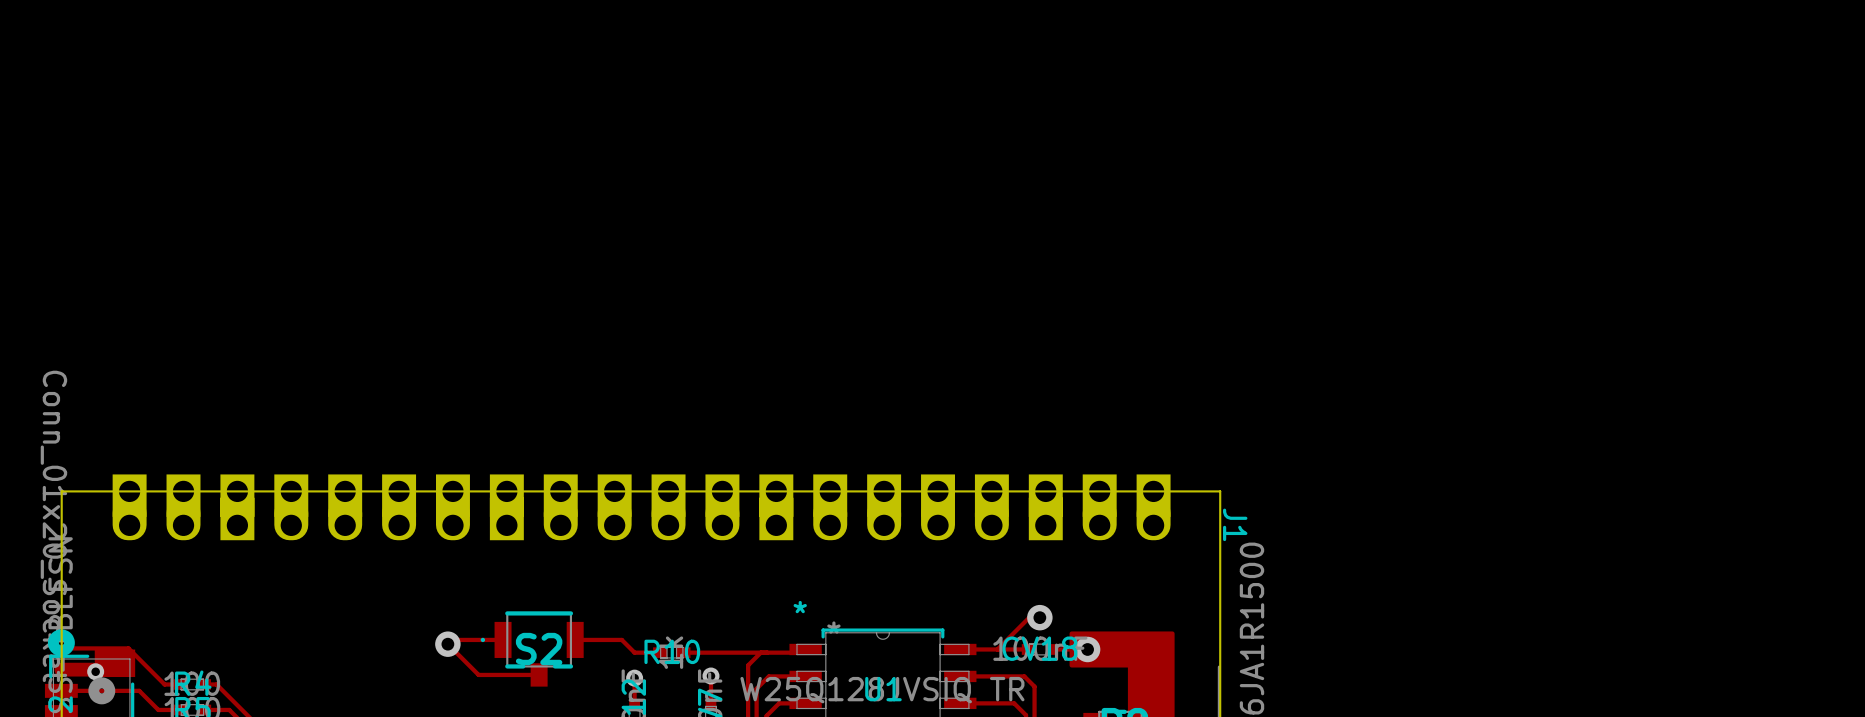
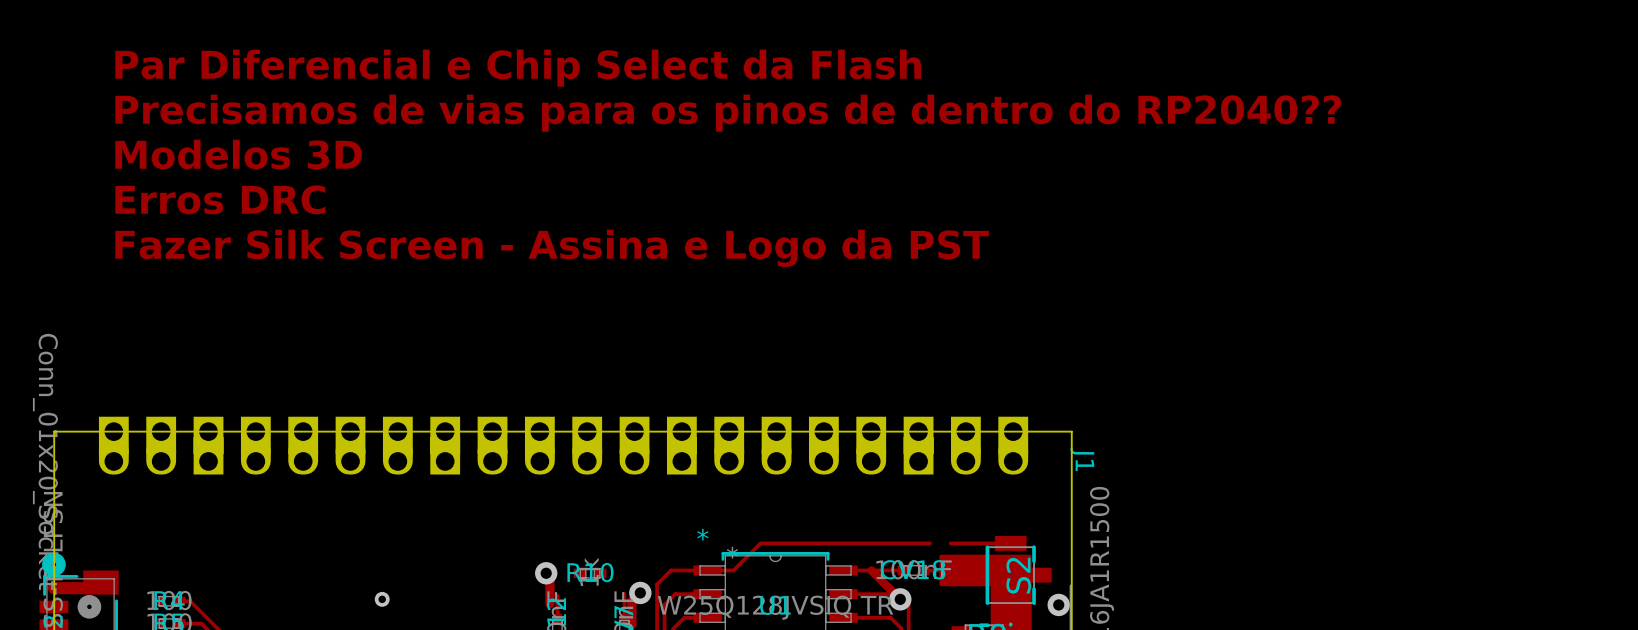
text: none -> Par Diferencial e Chip Select da Flash (518, 68)
text: none -> Precisamos de vias para os pinos de dentro do RP2040?? (728, 113)
text: none -> Modelos 3D (238, 154)
text: none -> Erros DRC (220, 199)
text: none -> Fazer Silk Screen - Assina e Logo da PST (552, 248)
track: (1039, 617) (1029, 617) (997, 649) -> none
via: (1039, 617) -> none
track: none -> (930, 543) (760, 543) (733, 570) (671, 570) (668, 573)
track: none -> (950, 543) (1010, 543)
track: (503, 639) (452, 639) (447, 644) (478, 674) (539, 674) -> none
track: (575, 639) (621, 639) (634, 652) (660, 652) -> none
via: (447, 644) -> none
track: (61, 648) (128, 648) (164, 684) (180, 684) -> none
S2 rotation: 0° (532, 648) -> 90° counterclockwise (1018, 581)
S2 position: (532, 648) -> (1018, 581)
track: none -> (871, 570) (900, 599)
via: (1087, 649) -> none
track: none -> (546, 573) (549, 576) (549, 603)
via: none -> (546, 573)
track: (683, 652) (802, 652) -> none
via: (95, 671) -> none
track: none -> (640, 592) (631, 601) (631, 624)
via position: (710, 676) -> (640, 592)
via: (634, 678) -> none
via: none -> (382, 599)
via: none -> (900, 599)
via: none -> (1058, 604)
track: (61, 690) (139, 690) (158, 709) (180, 709) -> none

